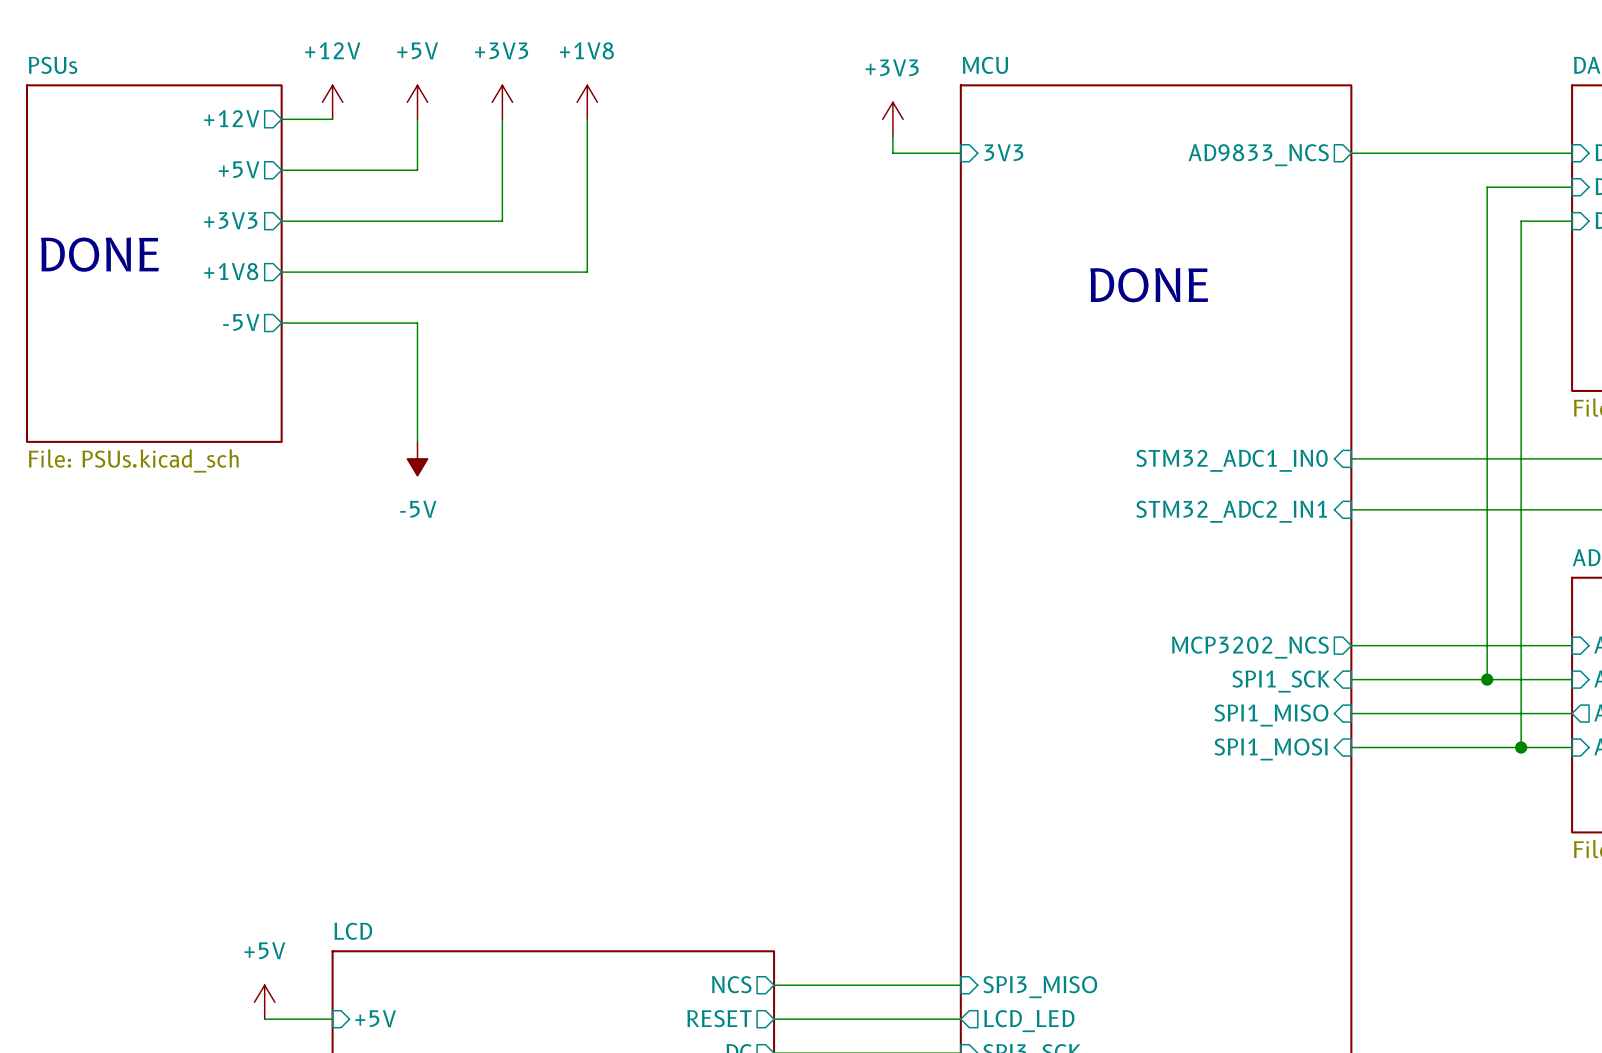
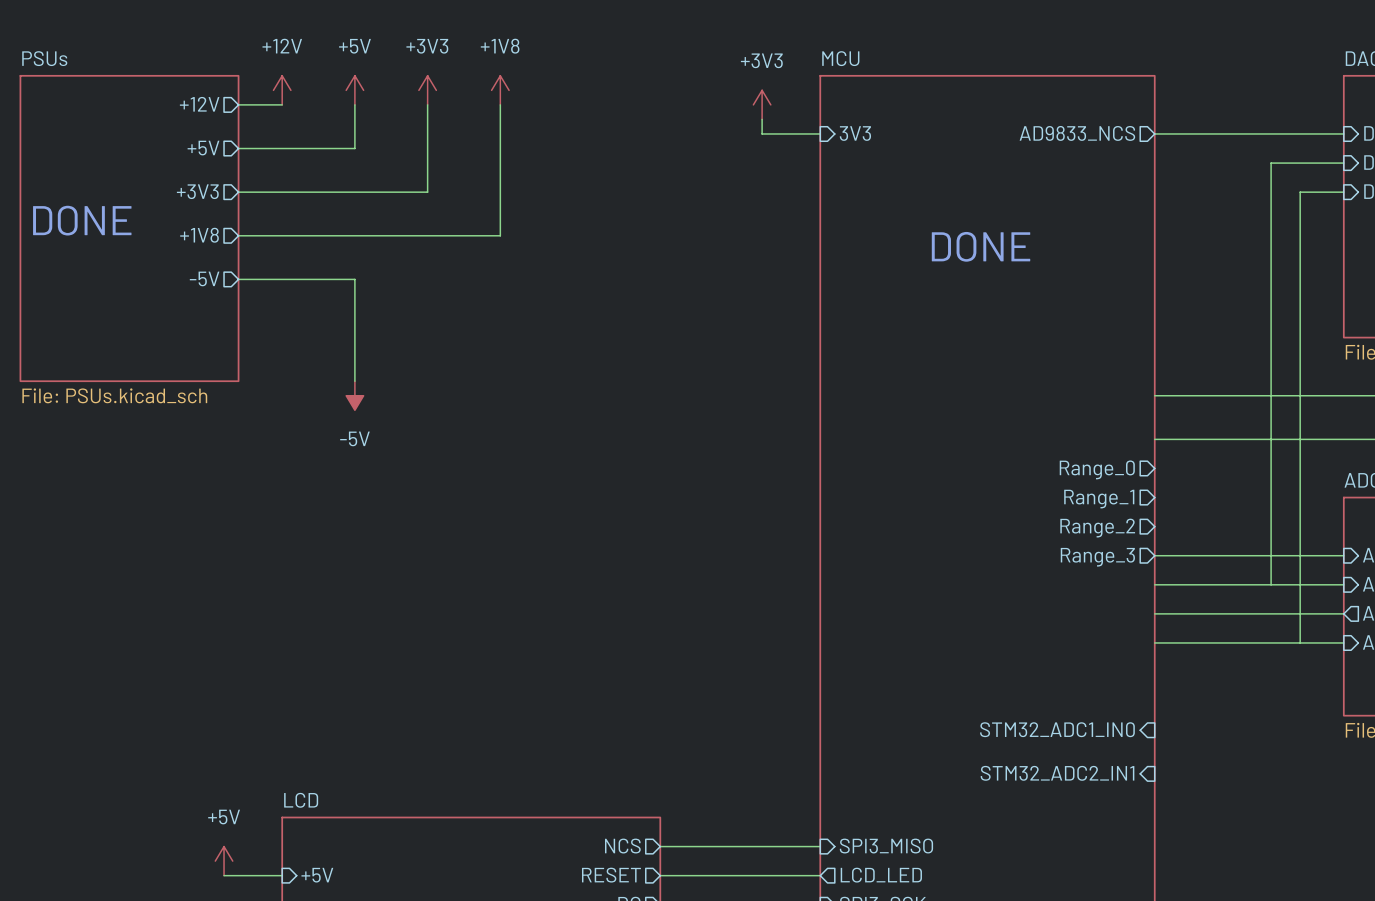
sheet pin: STM32_ADC1_IN0 (1232, 460) -> none
sheet pin: STM32_ADC2_IN1 (1231, 511) -> none
sheet pin: none -> Range_0 (1097, 469)
sheet pin: none -> Range_1 (1099, 499)
sheet pin: none -> Range_2 (1097, 528)
sheet pin: MCP3202_NCS (1250, 647) -> Range_3 (1097, 557)
junction: (1487, 679) -> none
sheet pin: SPI1_SCK (1281, 681) -> none
sheet pin: SPI1_MISO (1271, 715) -> none
junction: (1521, 747) -> none
sheet pin: SPI1_MOSI (1271, 749) -> none
sheet pin: none -> STM32_ADC1_IN0 (1057, 729)
sheet pin: none -> STM32_ADC2_IN1 (1057, 773)

